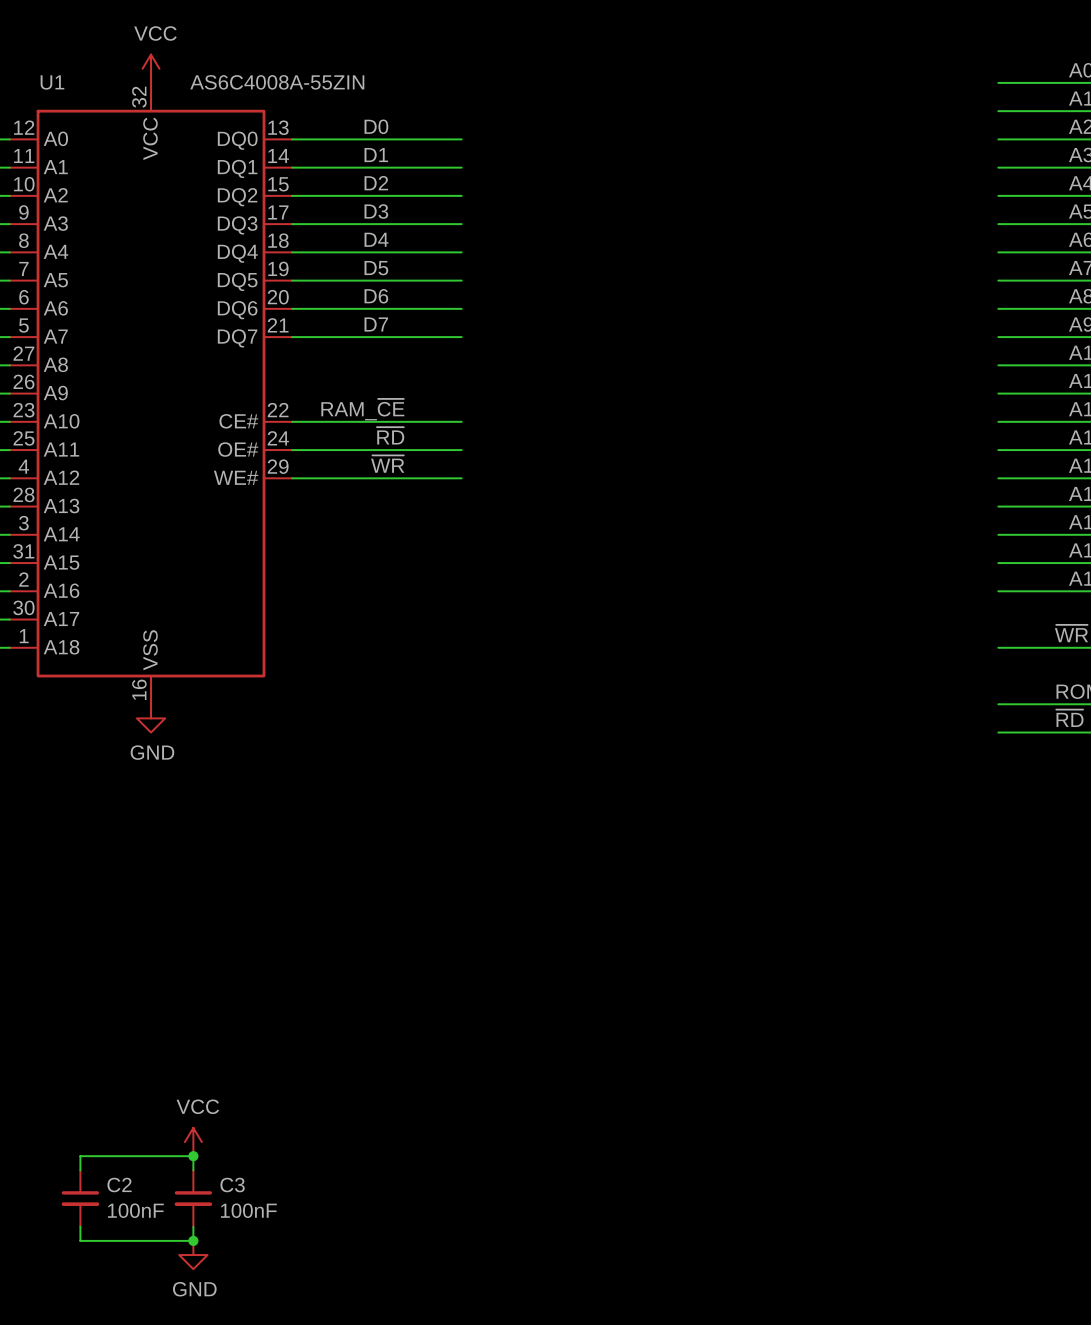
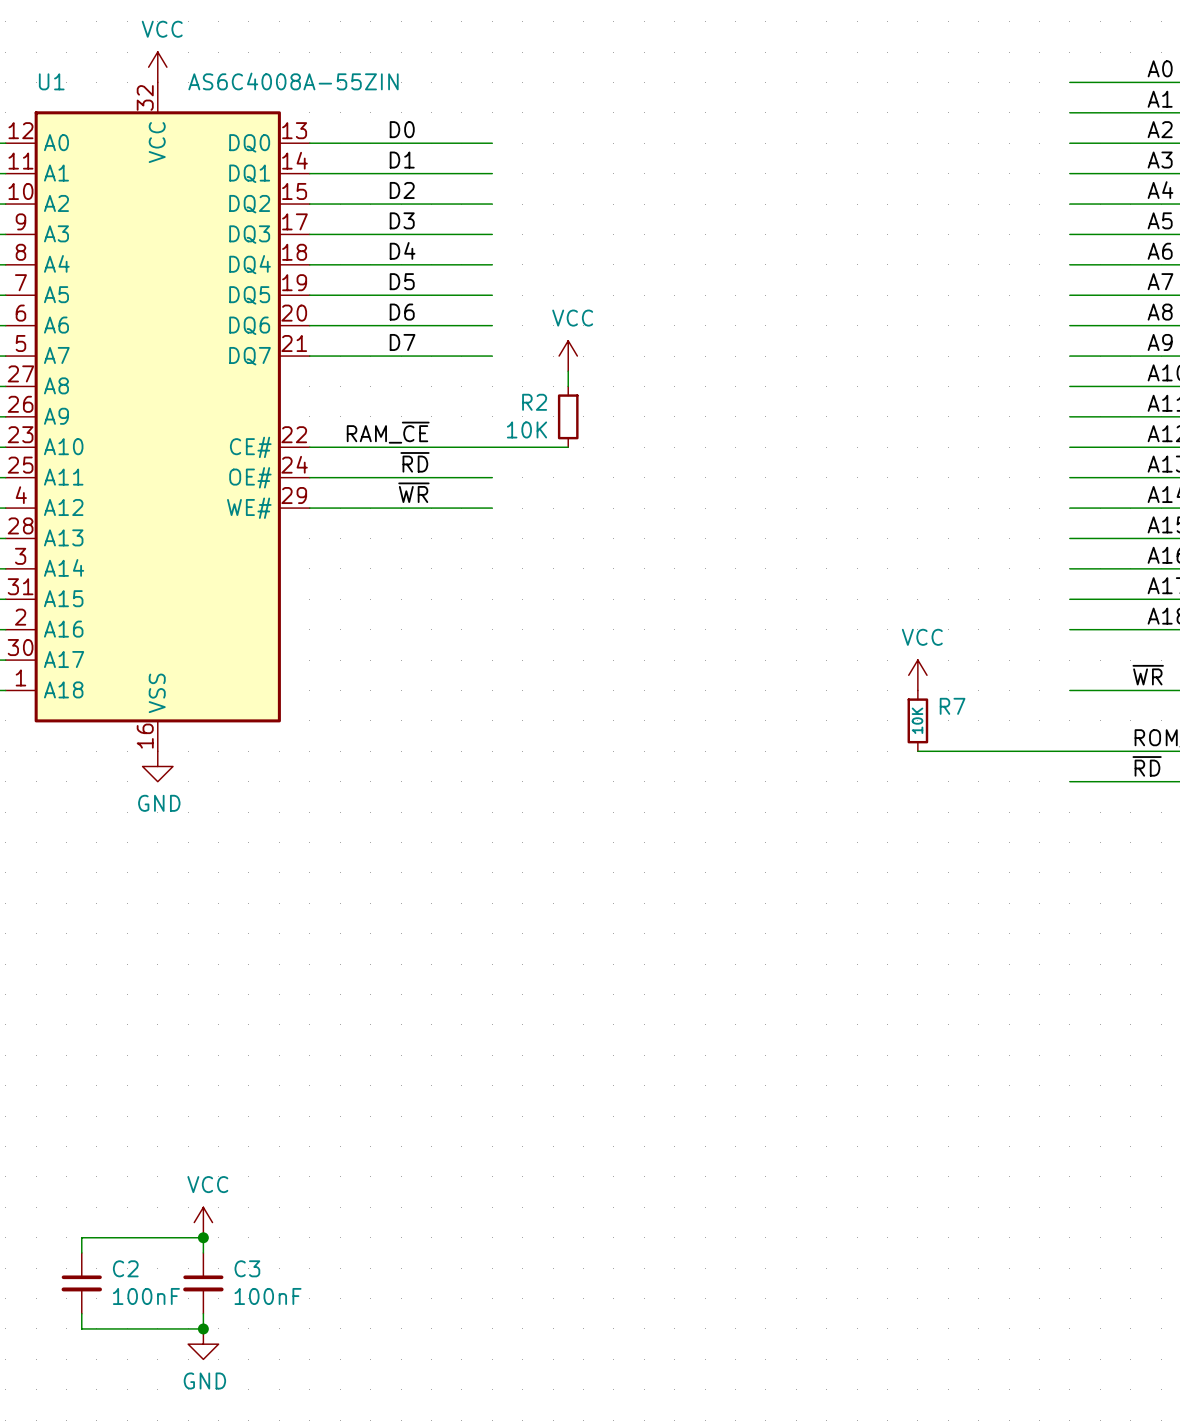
power symbol: none -> VCC (568, 356)
wire: none -> (568, 371) (568, 386)
R2: none -> 10K (568, 416)
wire: none -> (492, 447) (568, 447)
power symbol: none -> VCC (917, 675)
R7: none -> 10K (917, 720)
wire: none -> (917, 751) (1069, 751)

